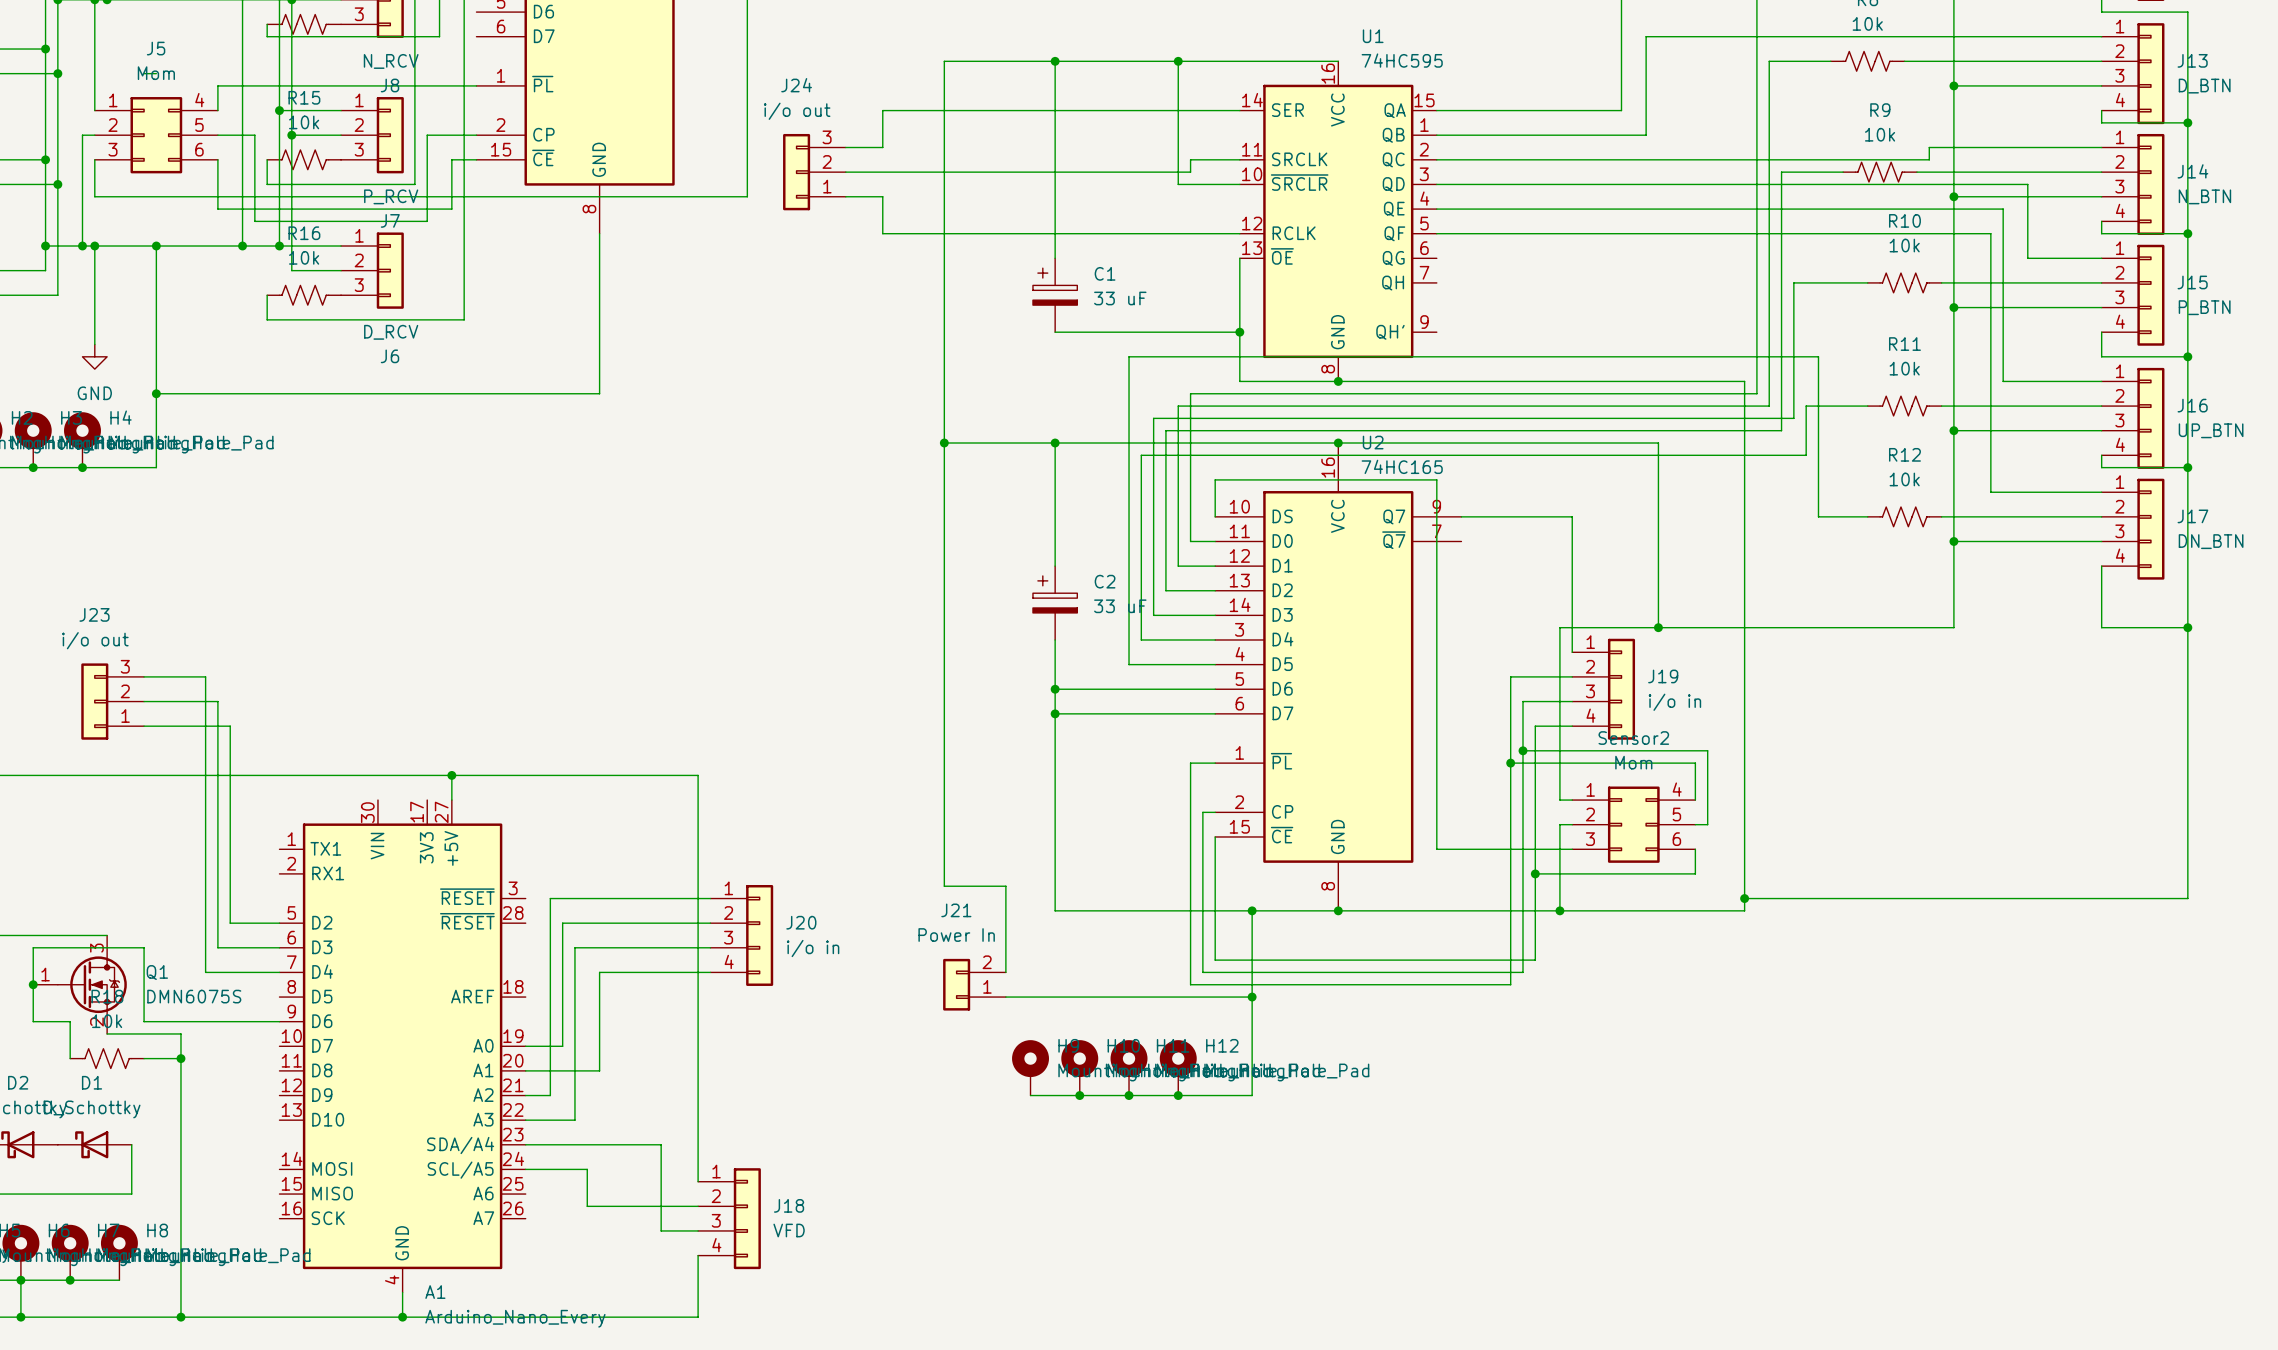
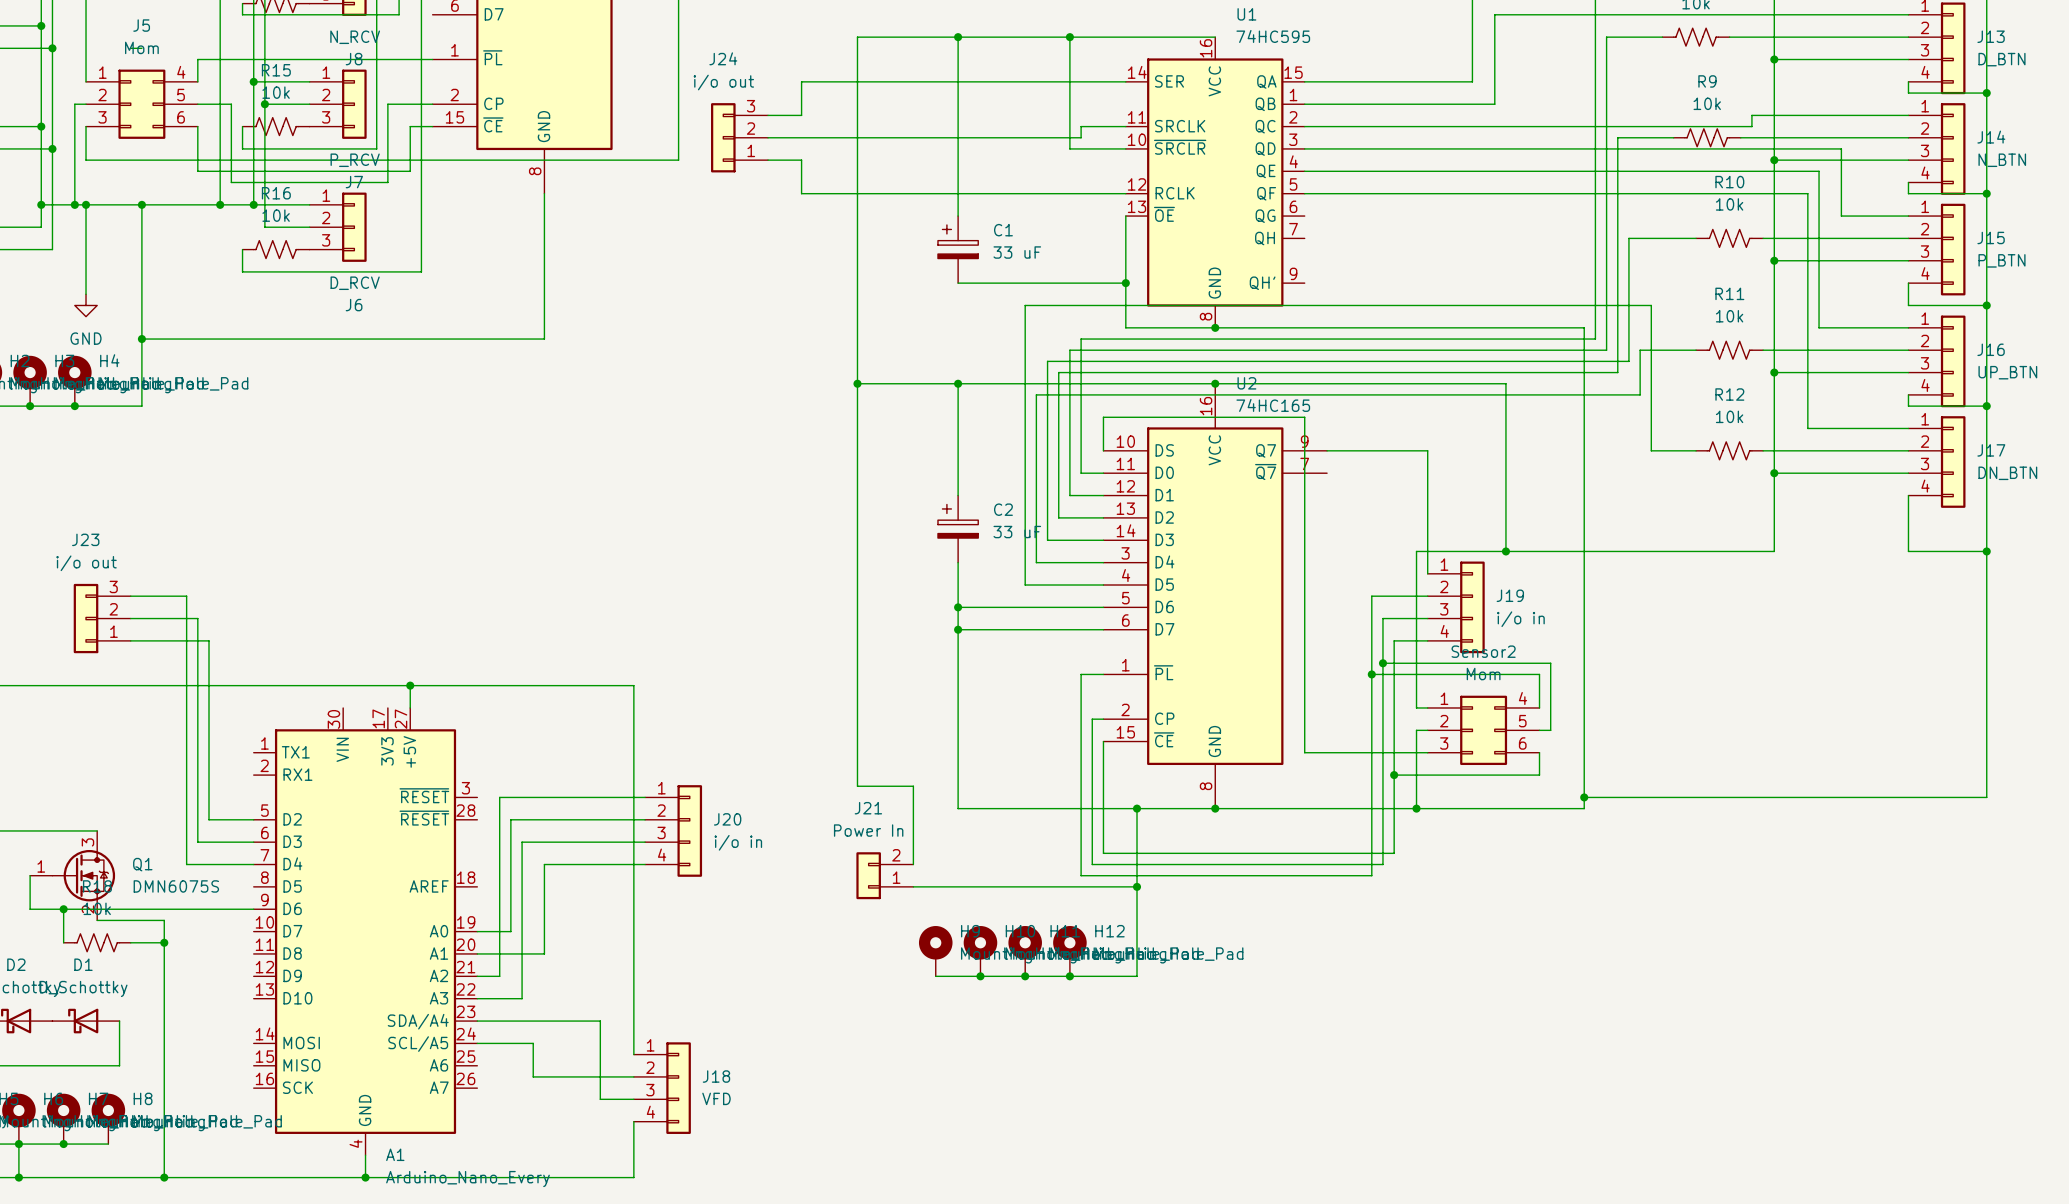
wire: (33, 984) (33, 947) (144, 947) (144, 1021) -> (63, 909) (130, 909)
junction position: (33, 984) -> (63, 909)

